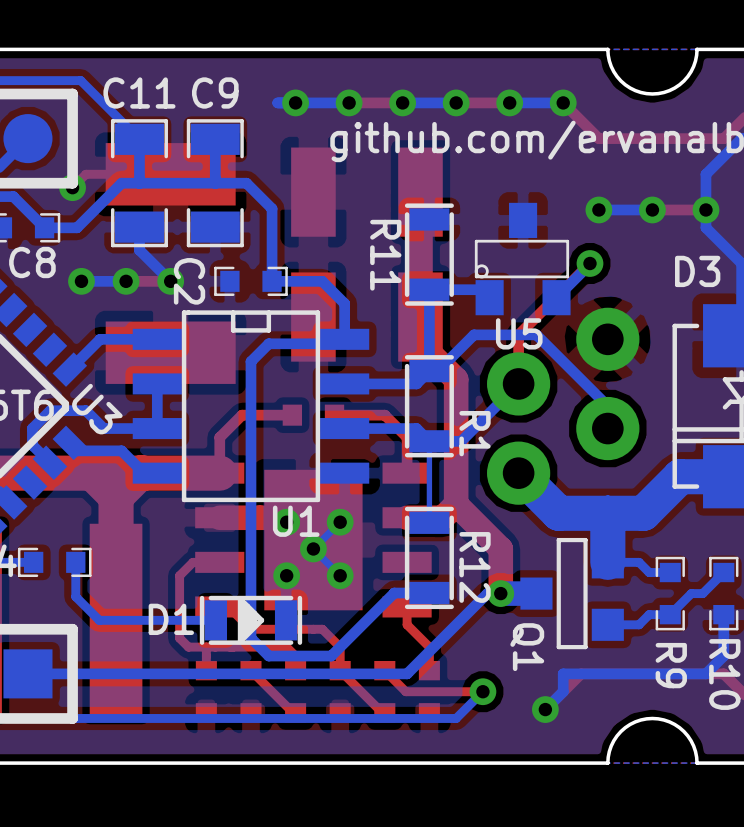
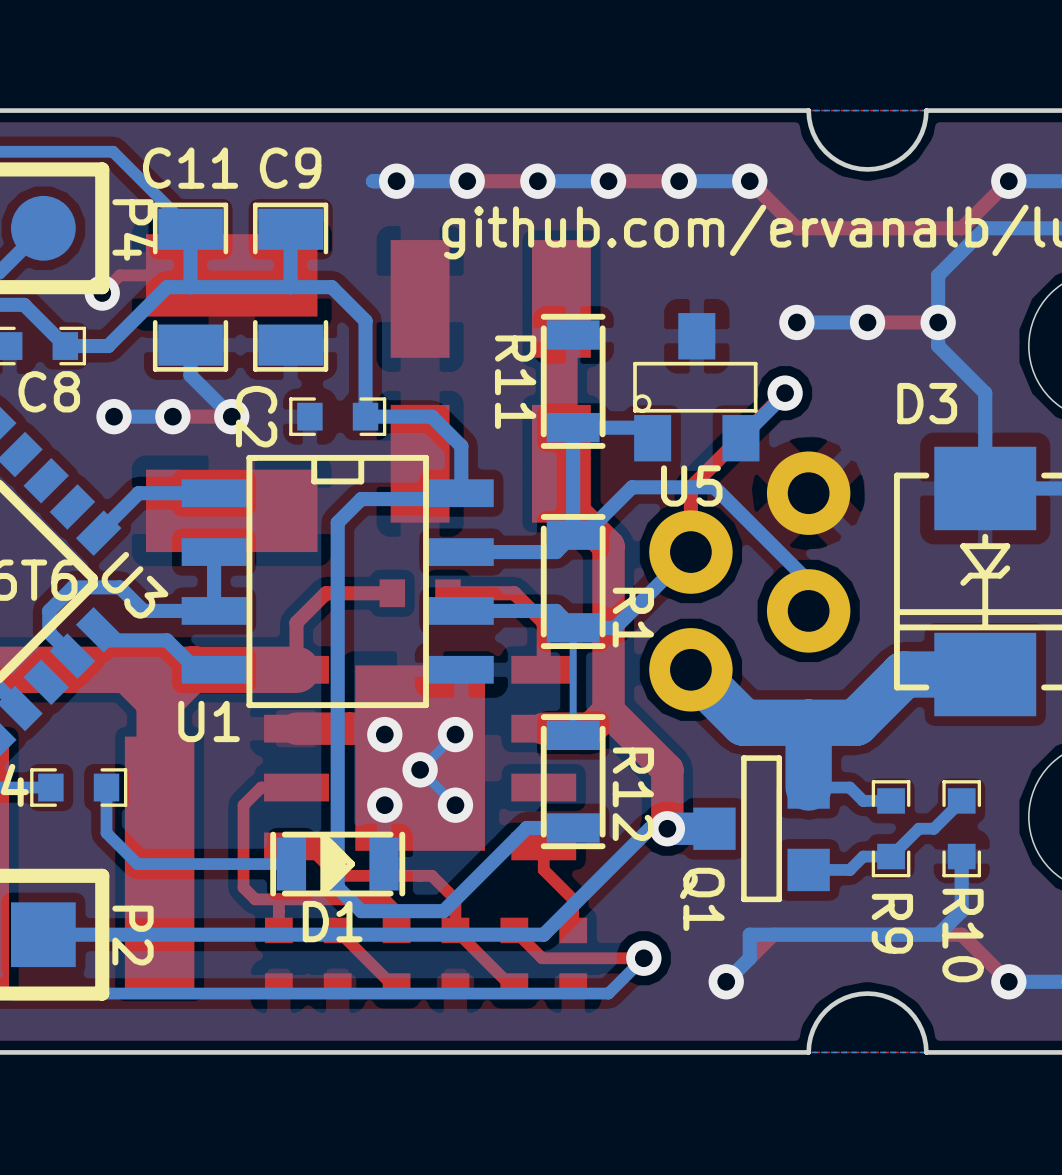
P4 name: none -> P4 (133, 229)
U1 name position: U1 (296, 521) -> U1 (209, 721)
D1 name position: D1 (171, 619) -> D1 (332, 921)
P2 name: none -> P2 (133, 935)

